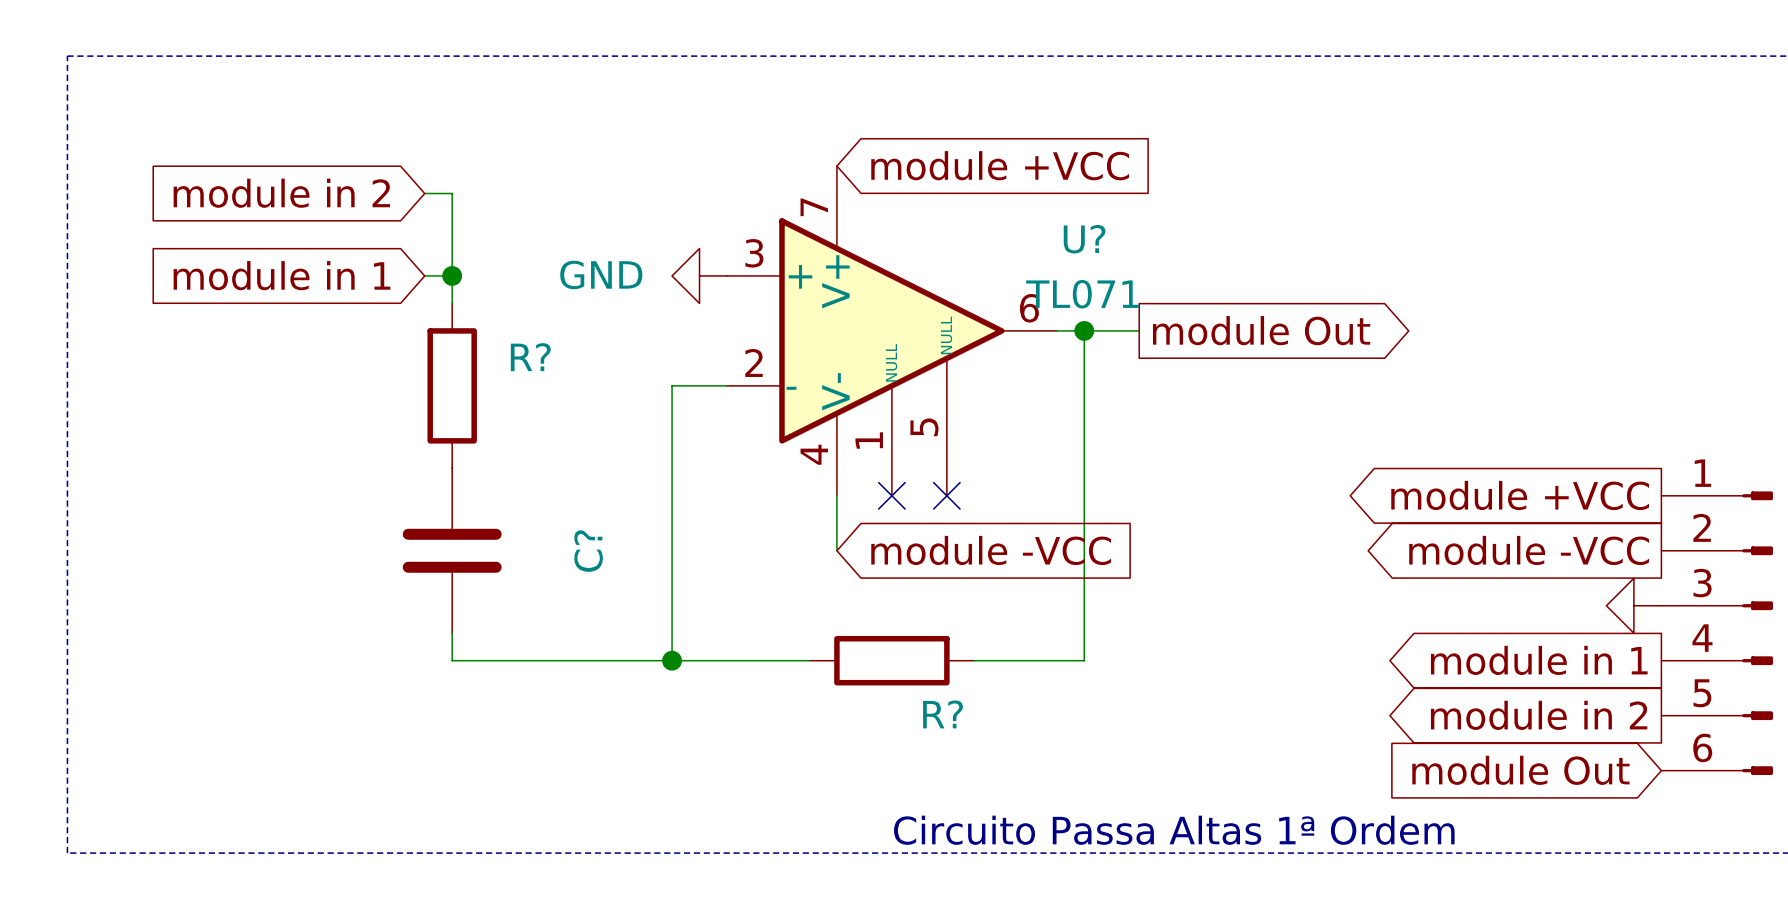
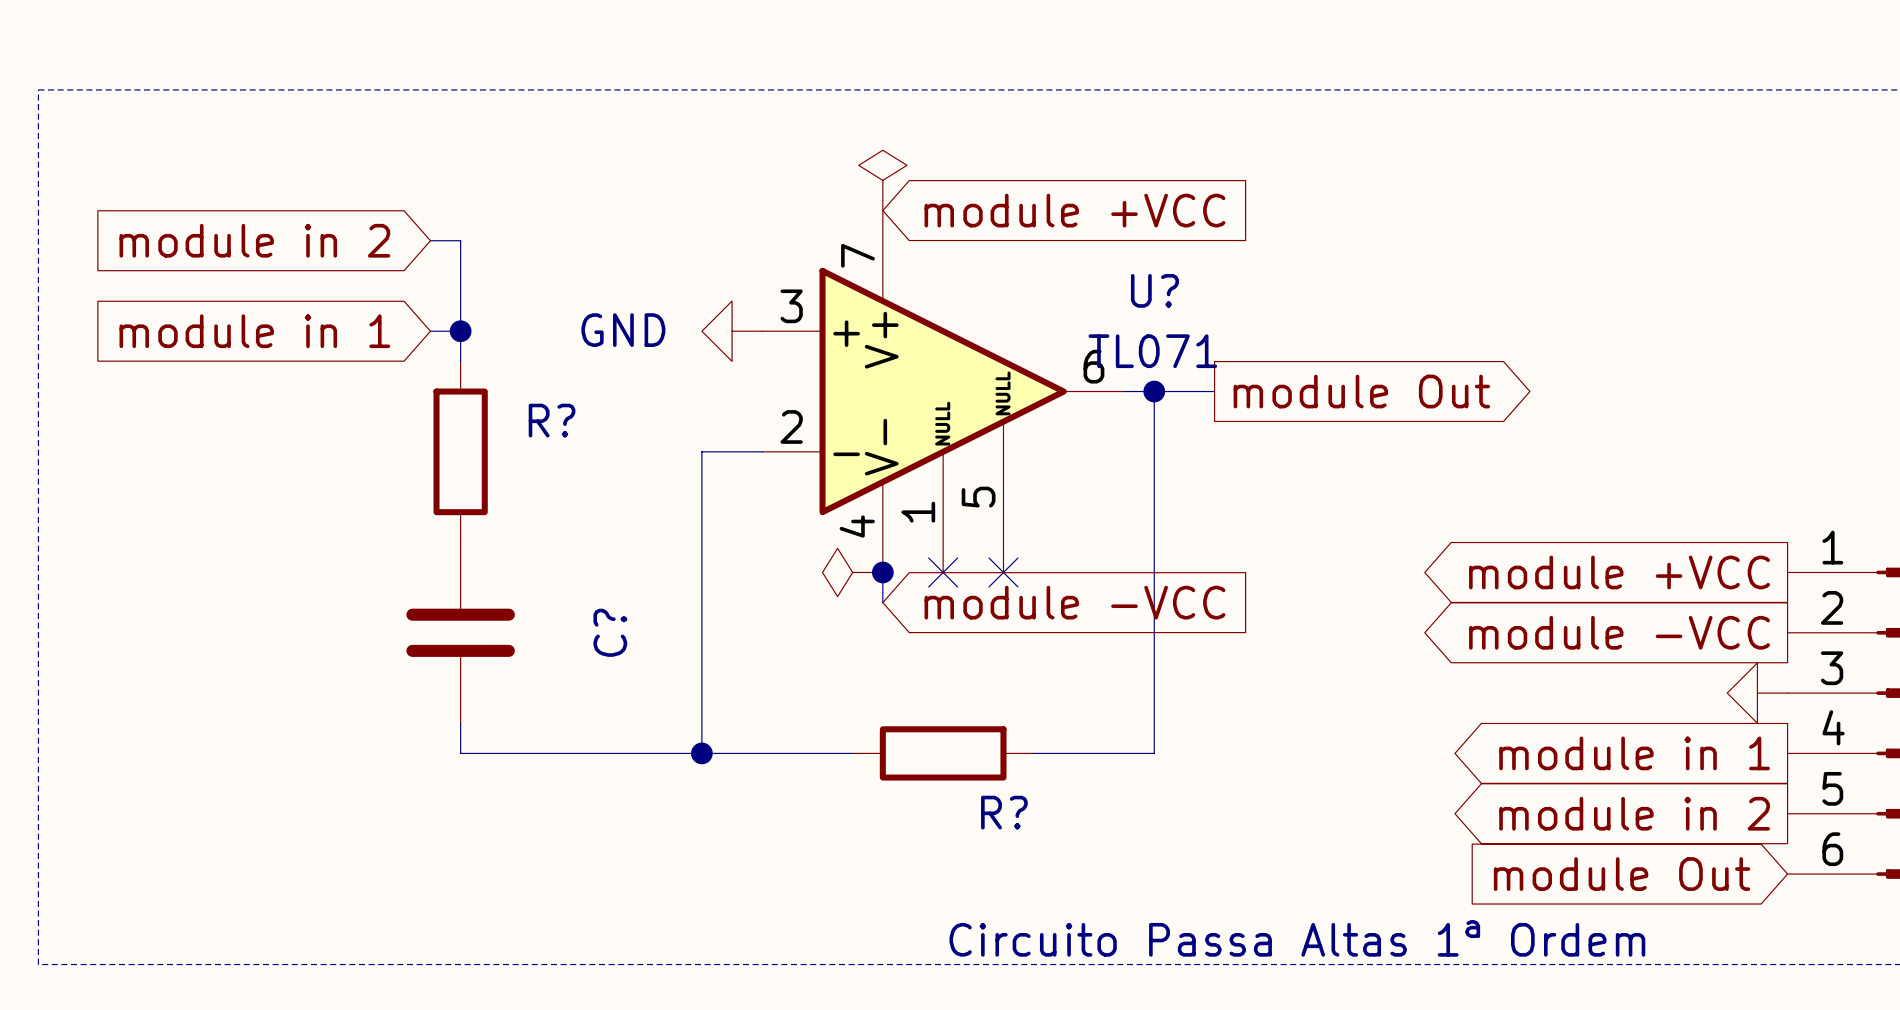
power symbol: none -> (882, 180)
power symbol: none -> (852, 572)
junction: none -> (882, 572)
wire: (836, 523) (836, 550) -> none
global label position: module -VCC (991, 550) -> module -VCC (1074, 602)

